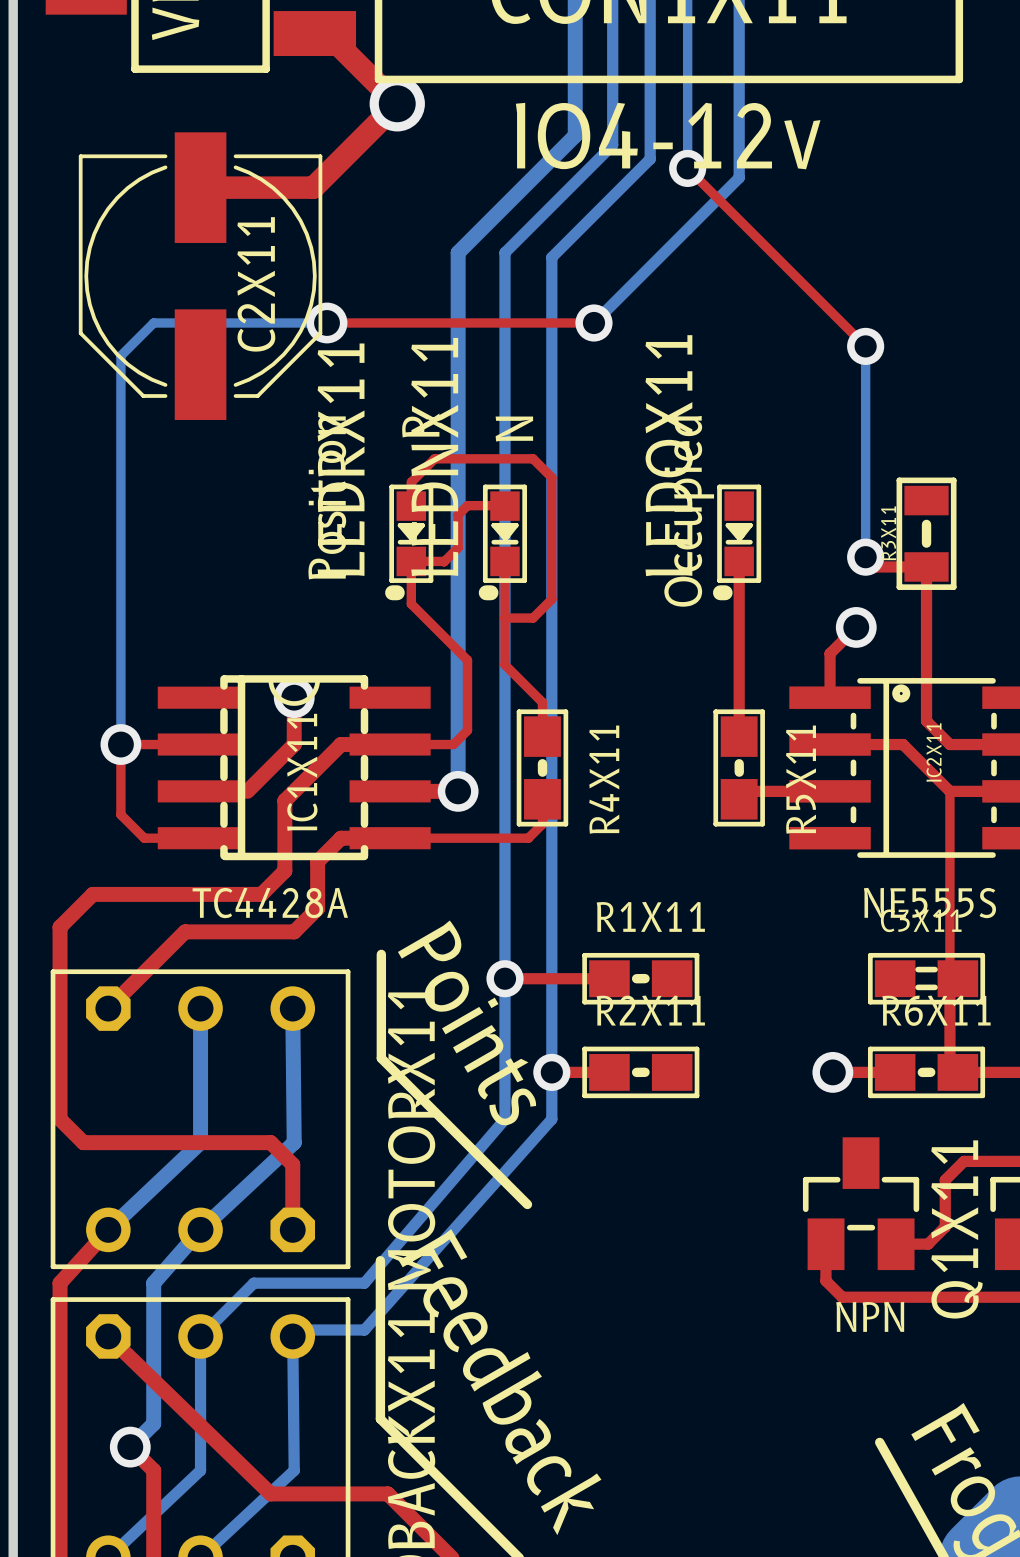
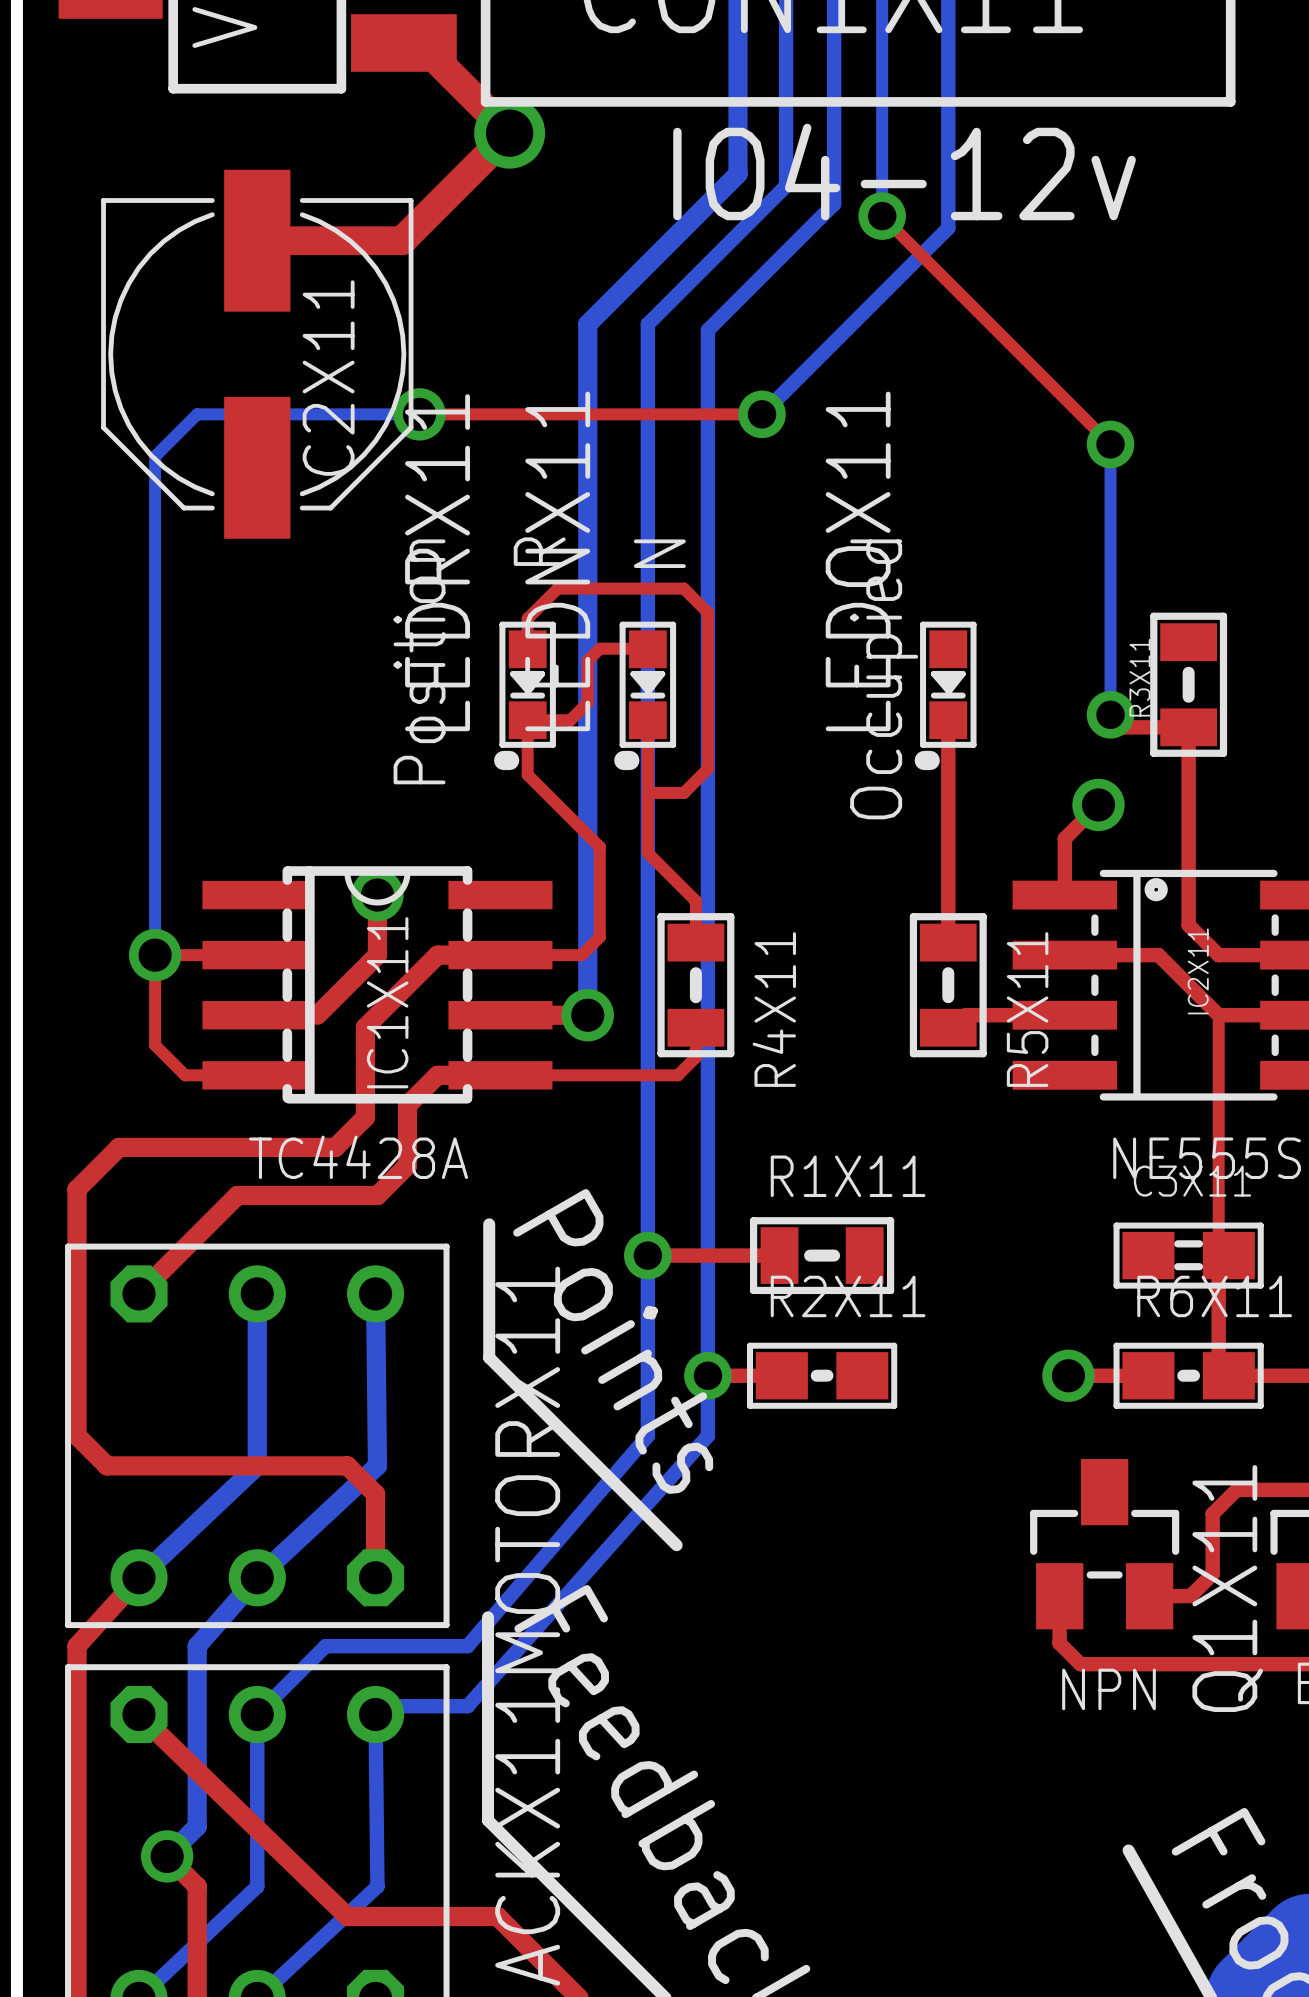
R4X11 footprint: [516, 709, 569, 827] -> [657, 913, 735, 1058]
R5X11 footprint: [713, 709, 765, 827] -> [909, 913, 987, 1058]
R1X11 footprint: [582, 952, 700, 1005] -> [749, 1217, 895, 1295]

